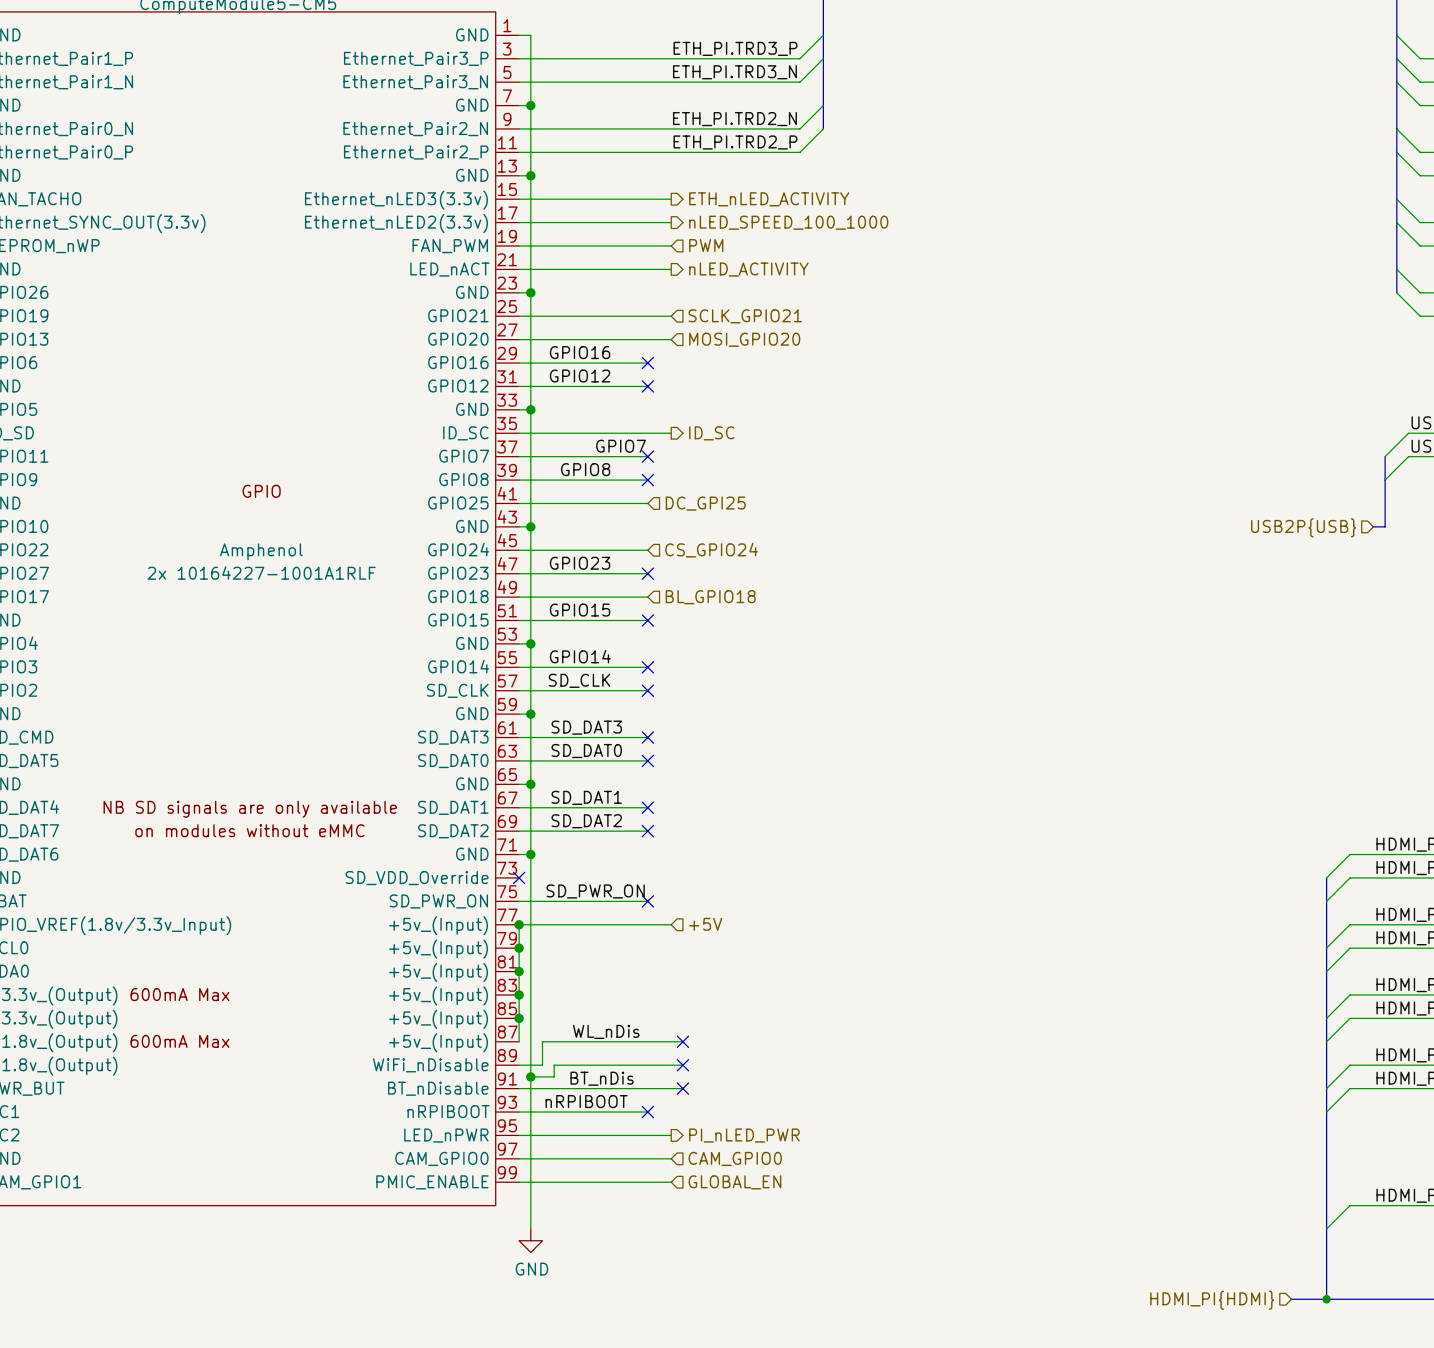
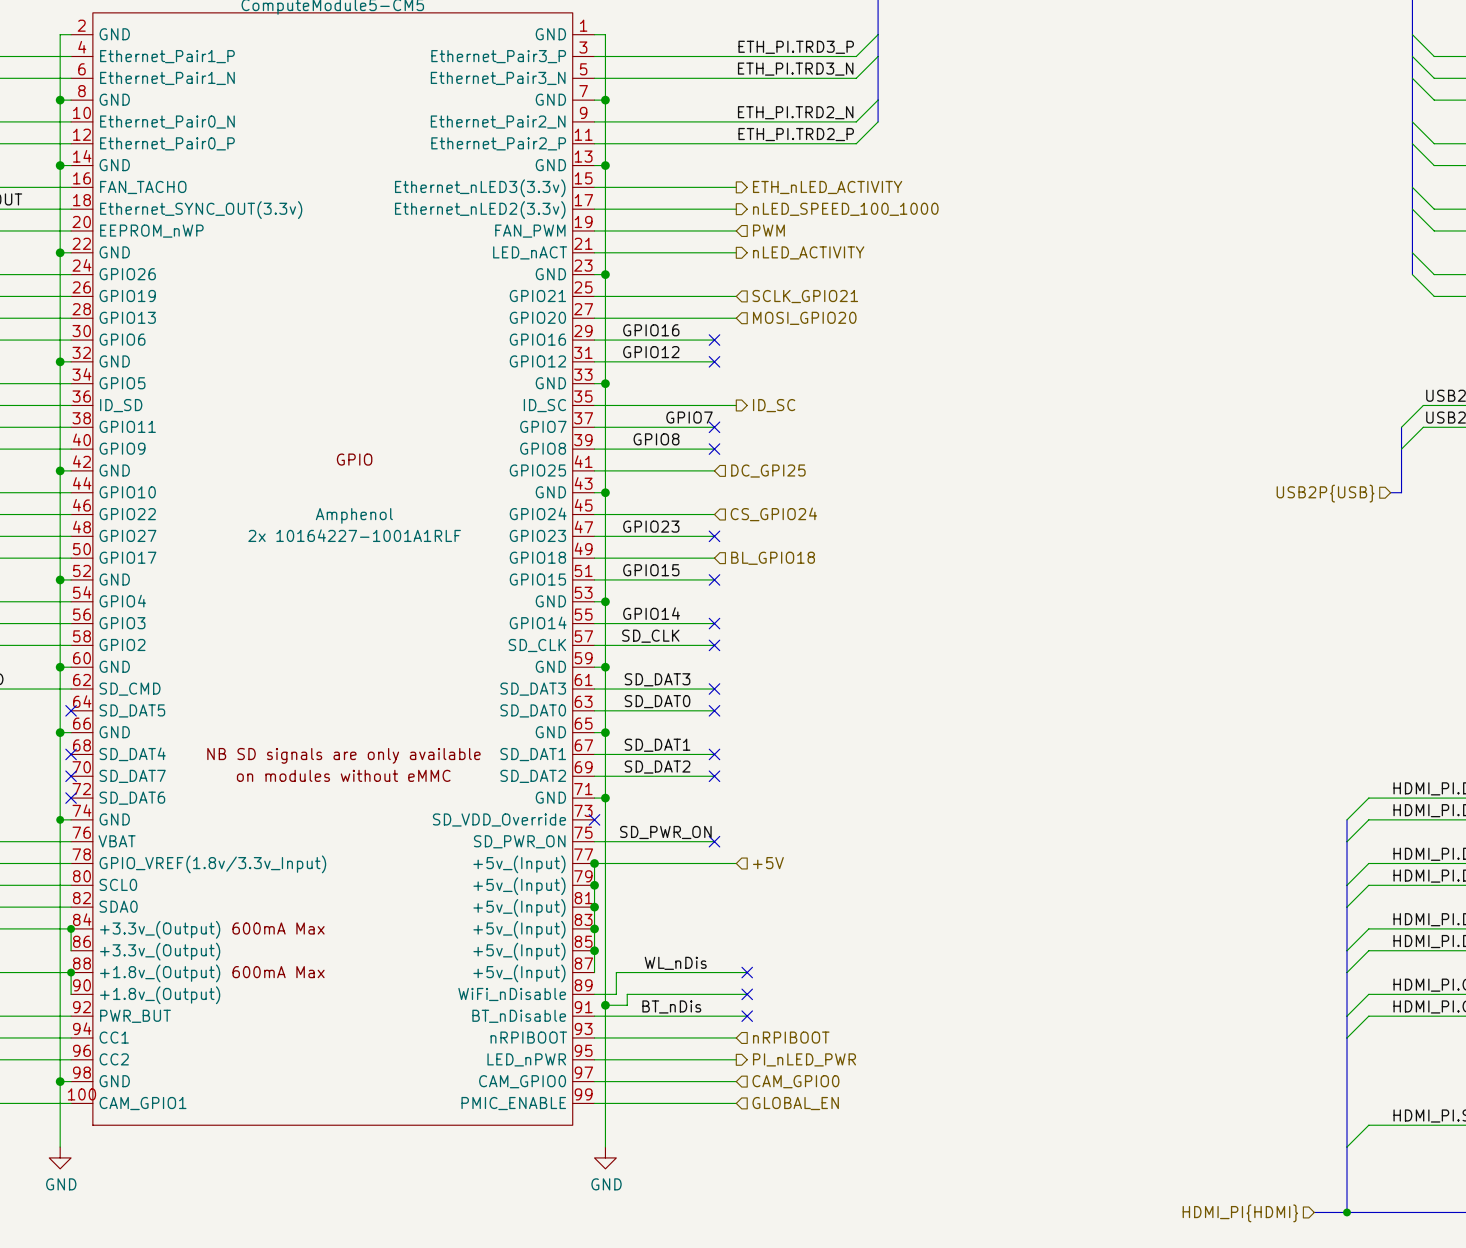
label: nRPIBOOT (586, 1101) -> none
hierarchical label: none -> nRPIBOOT (791, 1037)
wire: none -> (714, 1037) (736, 1037)
no-connect mark: (647, 1112) -> none

